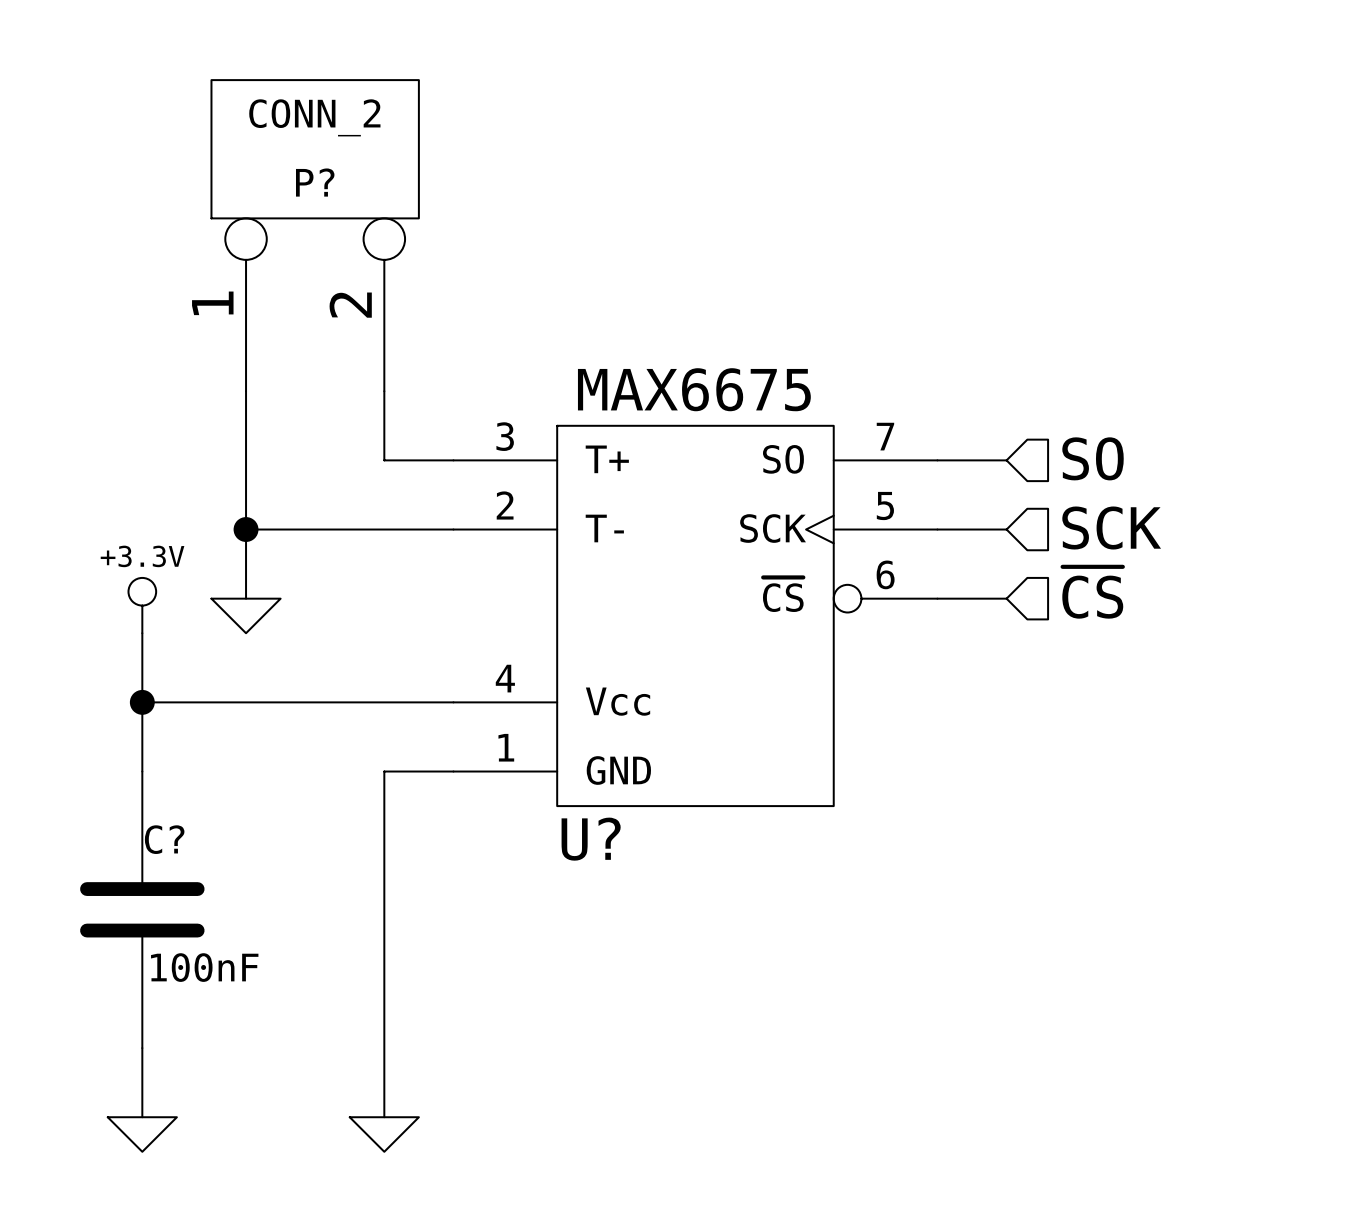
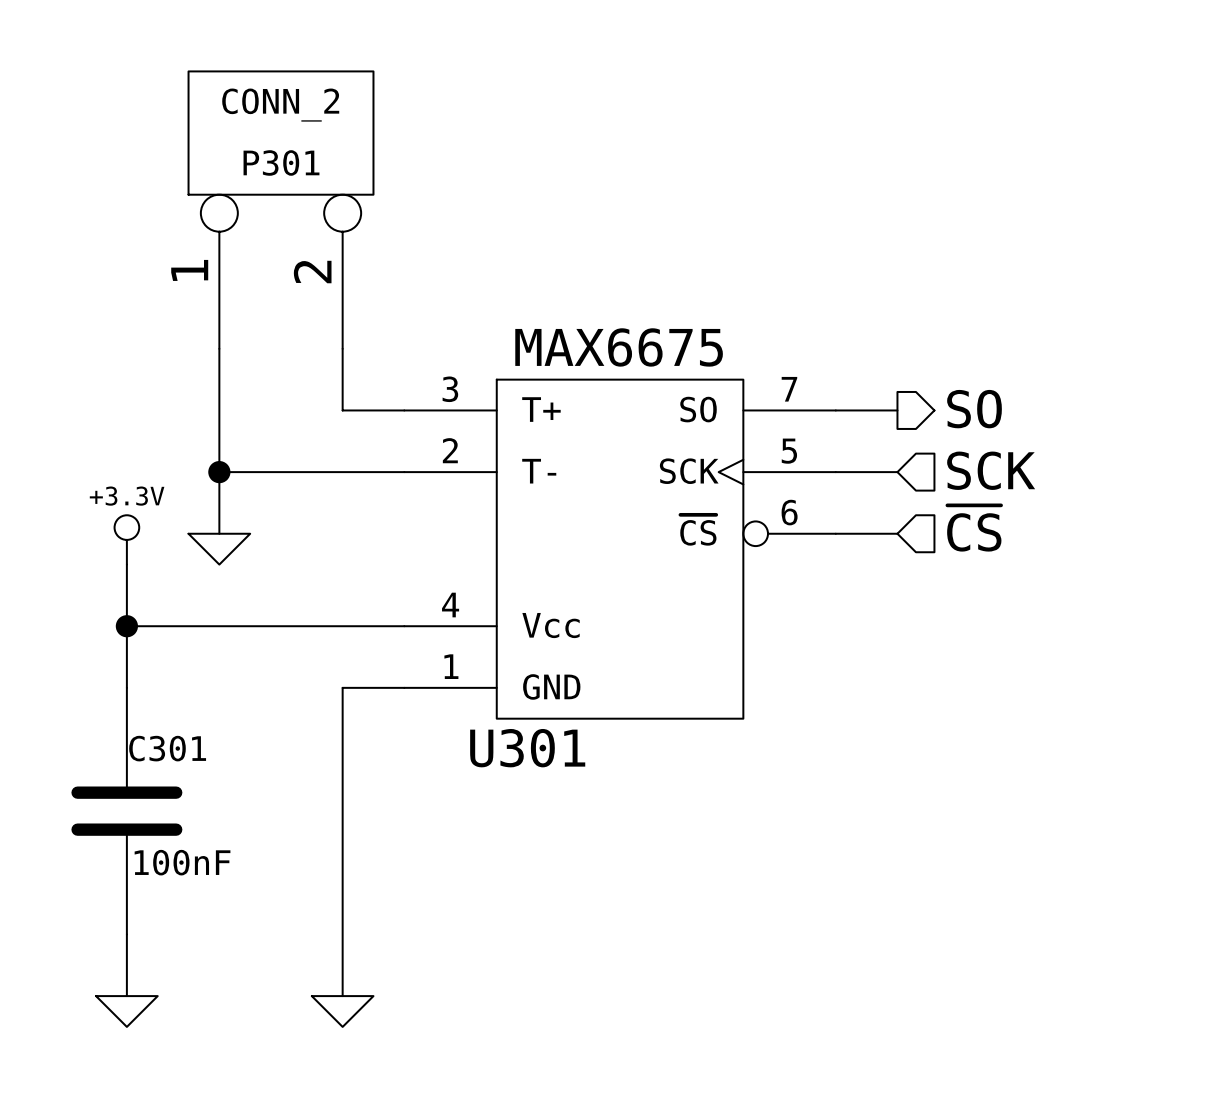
P? name: P? (315, 182) -> P301 (281, 162)
hierarchical label shape: input (1093, 458) -> output (974, 409)
C? name: C? (164, 839) -> C301 (167, 748)
U? name: U? (591, 839) -> U301 (527, 748)

